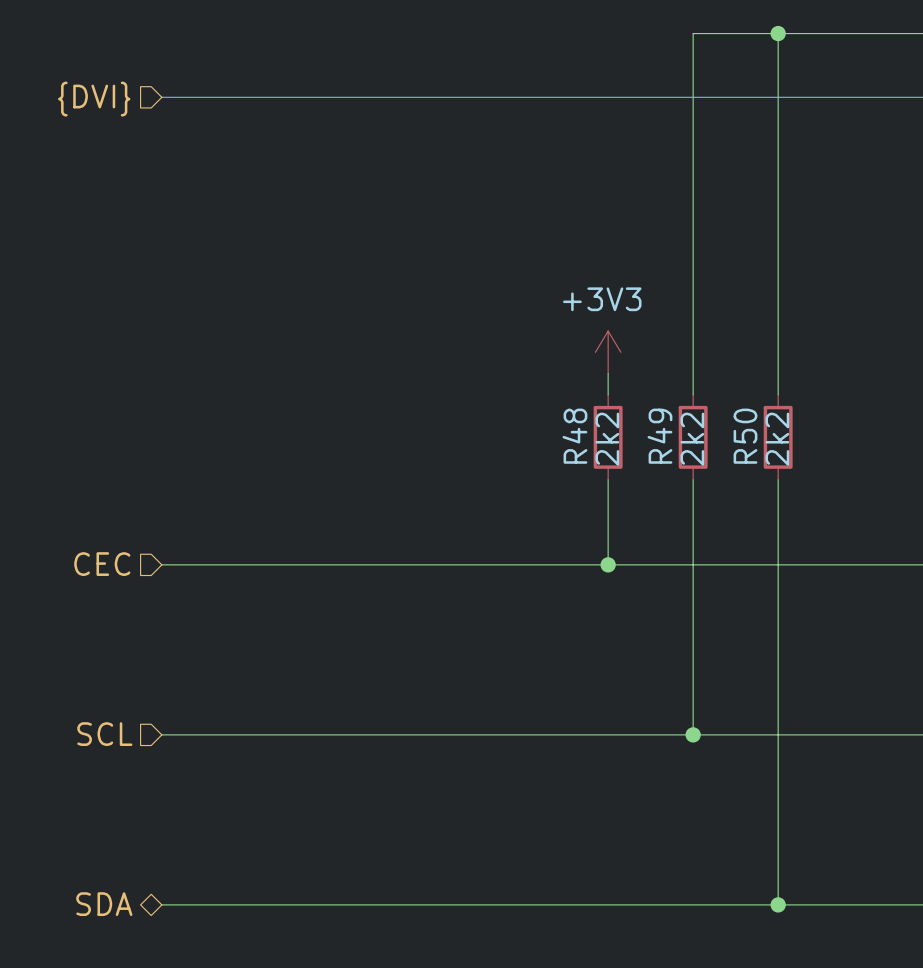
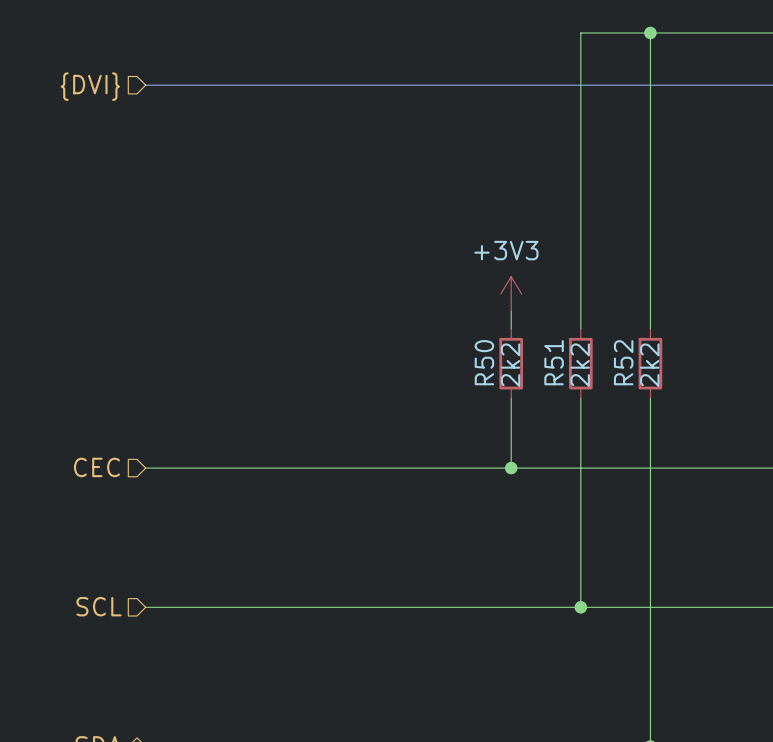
R48 name: R48 (574, 436) -> R50 (484, 362)
R49 name: R49 (659, 436) -> R51 (554, 362)
R50 name: R50 (745, 436) -> R52 (623, 362)

